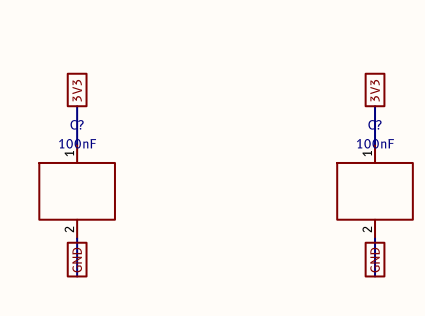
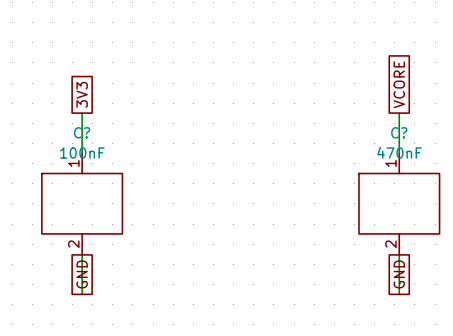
global label: 3V3 (375, 90) -> VCORE (399, 84)
C? value: 100nF (375, 143) -> 470nF (399, 152)

